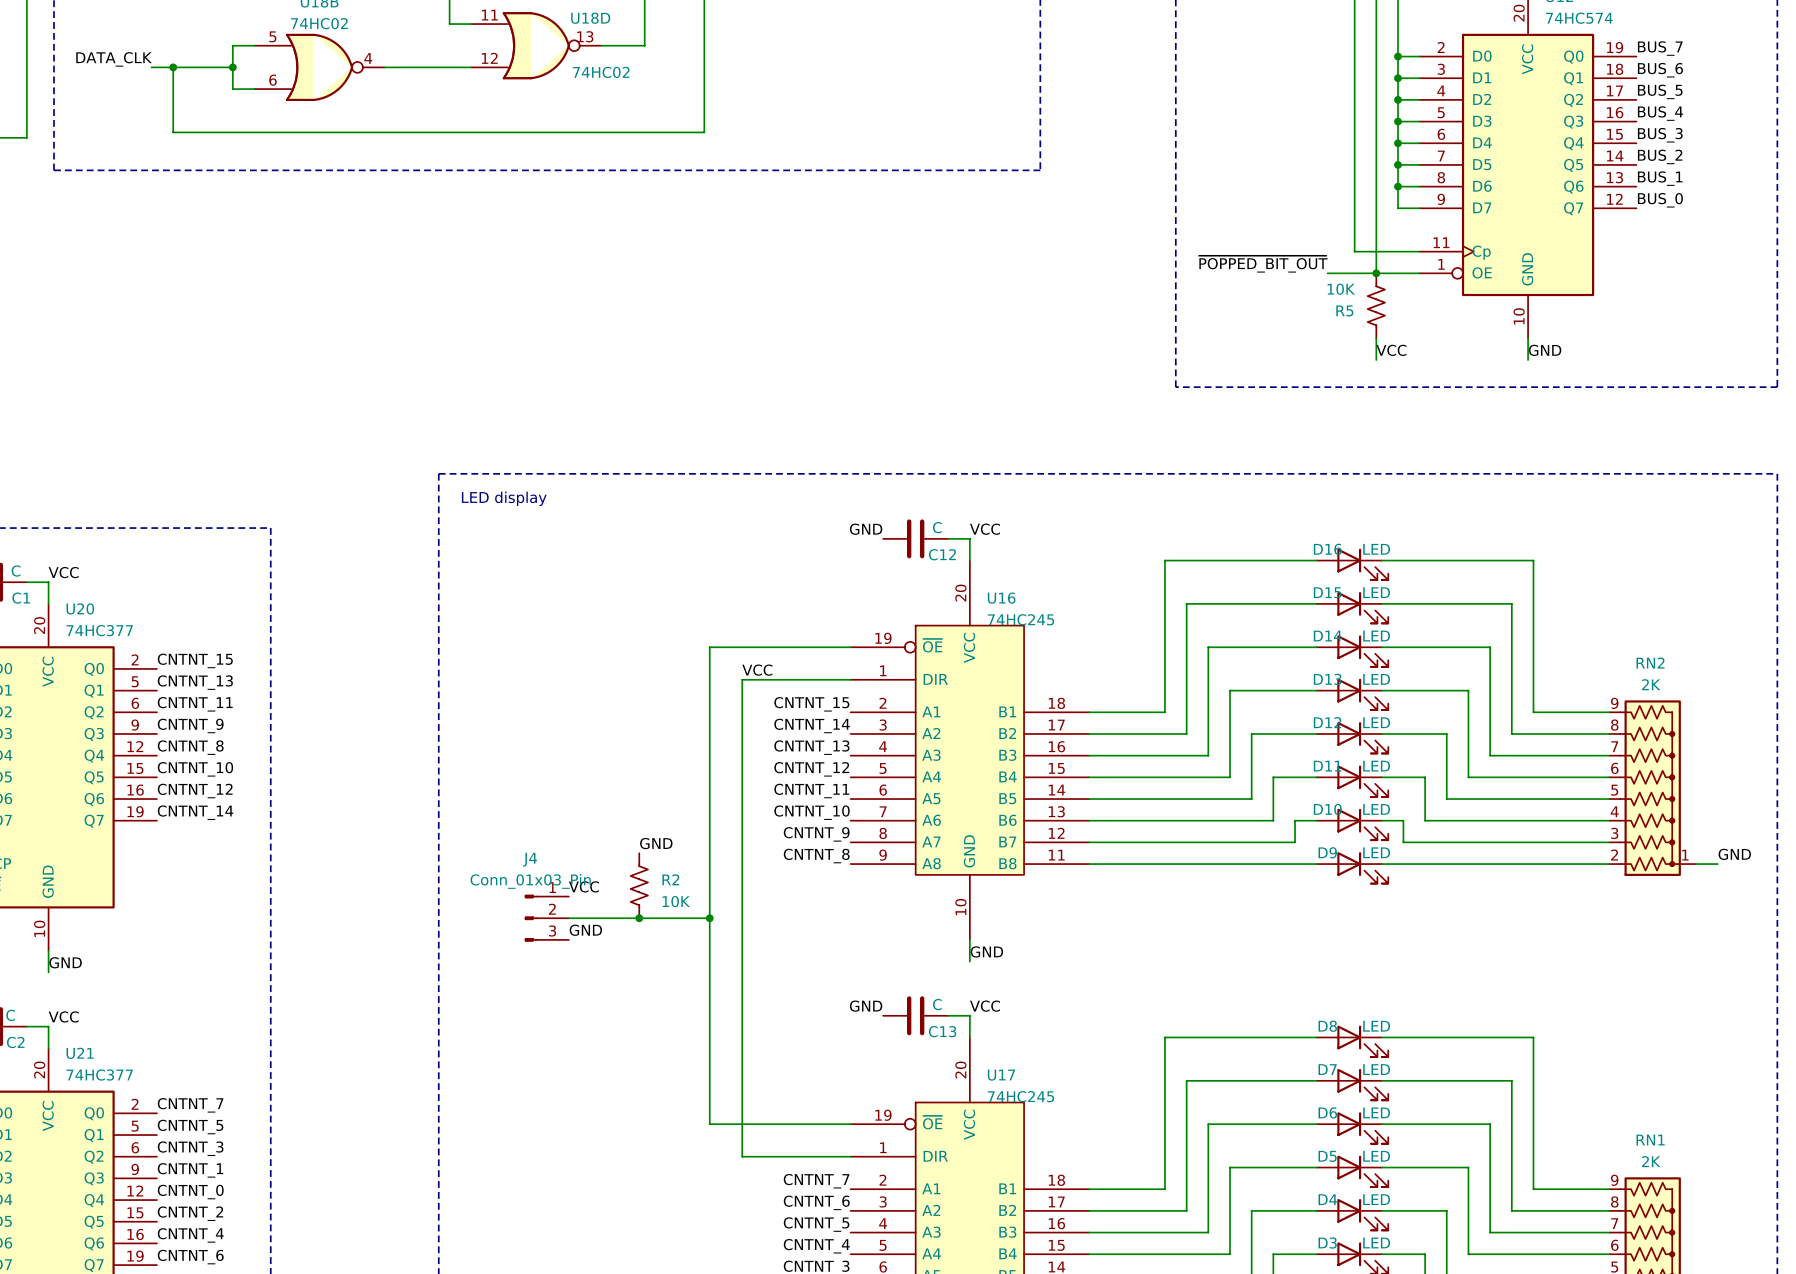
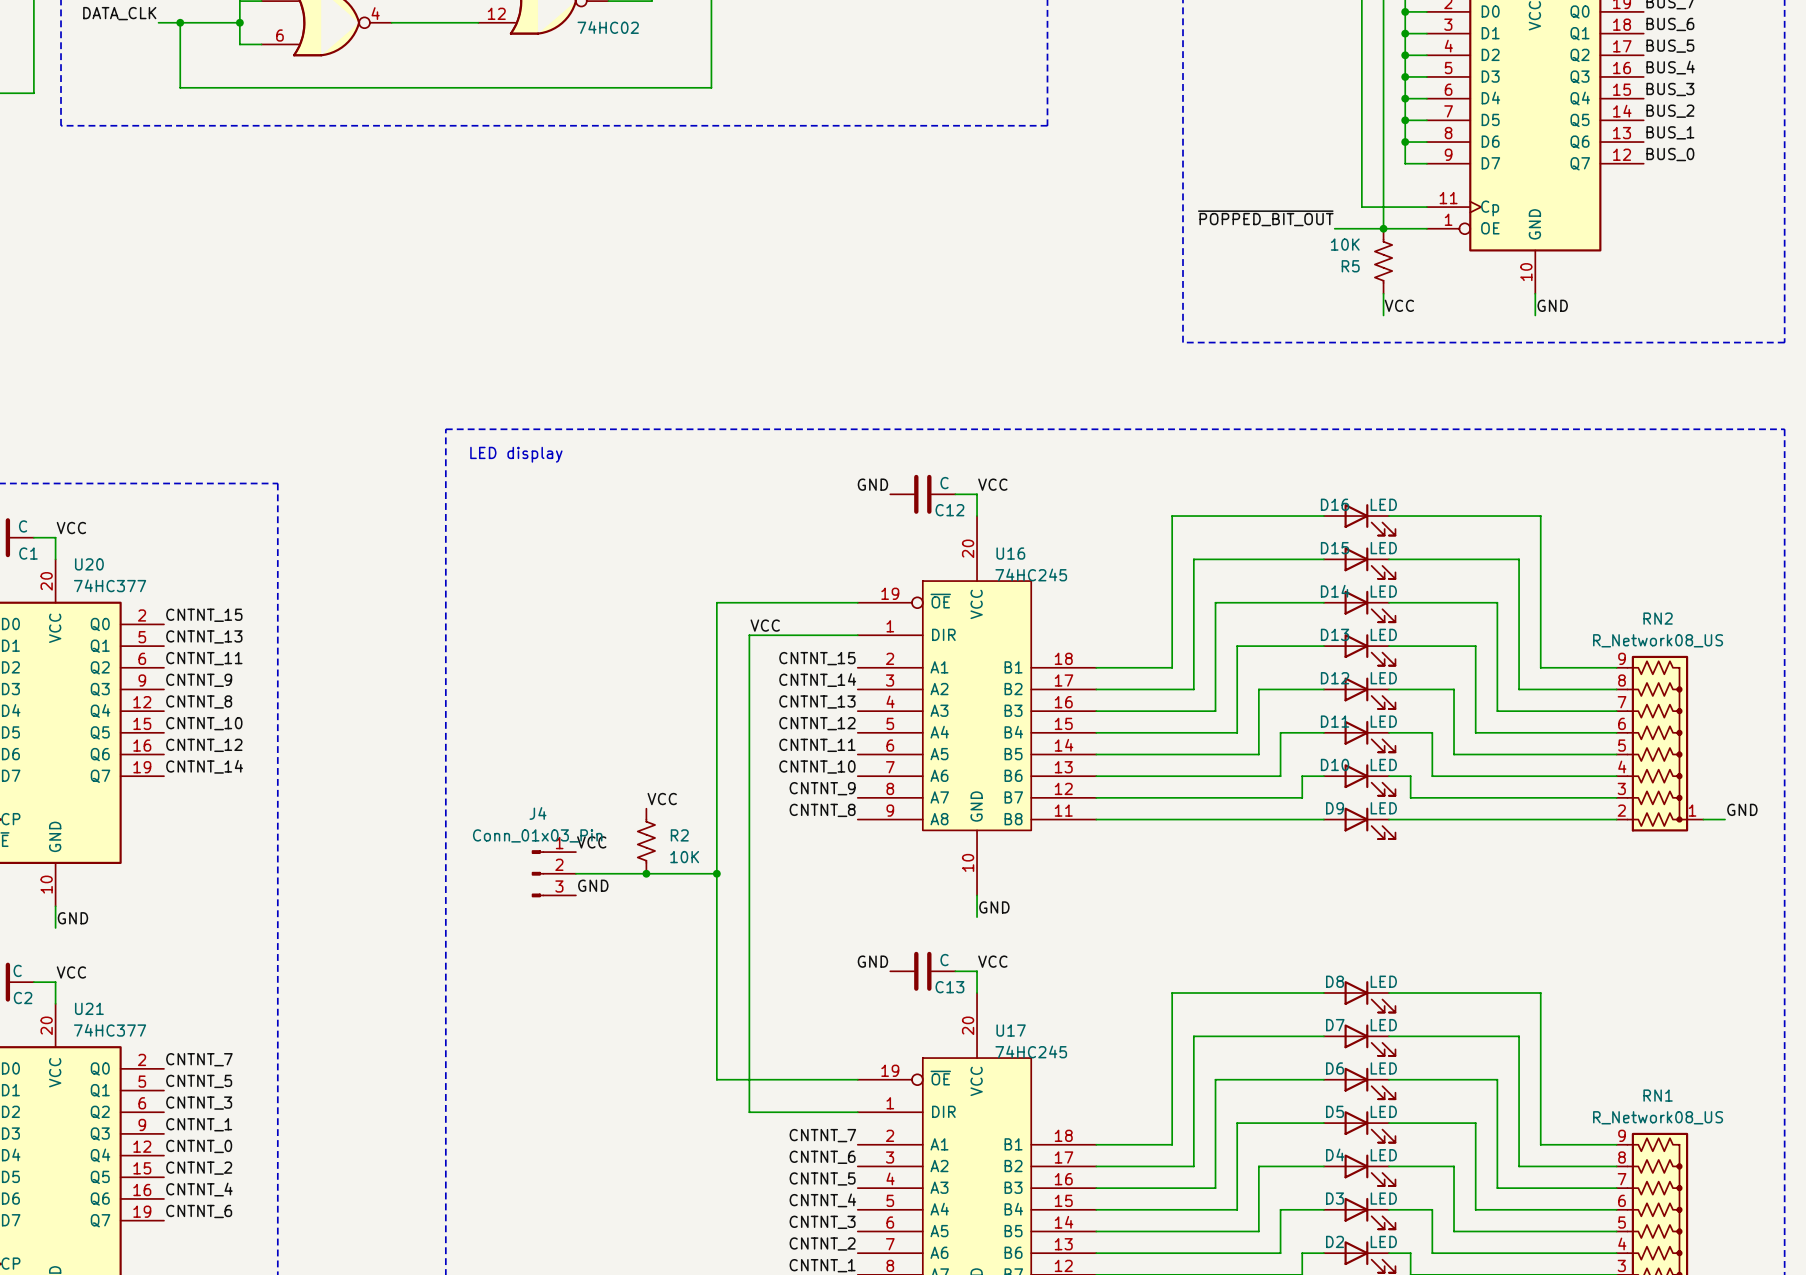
RN2 value: 2K (1651, 684) -> R_Network08_US (1658, 640)
label: GND (656, 843) -> VCC (662, 799)
RN1 value: 2K (1651, 1161) -> R_Network08_US (1658, 1117)

